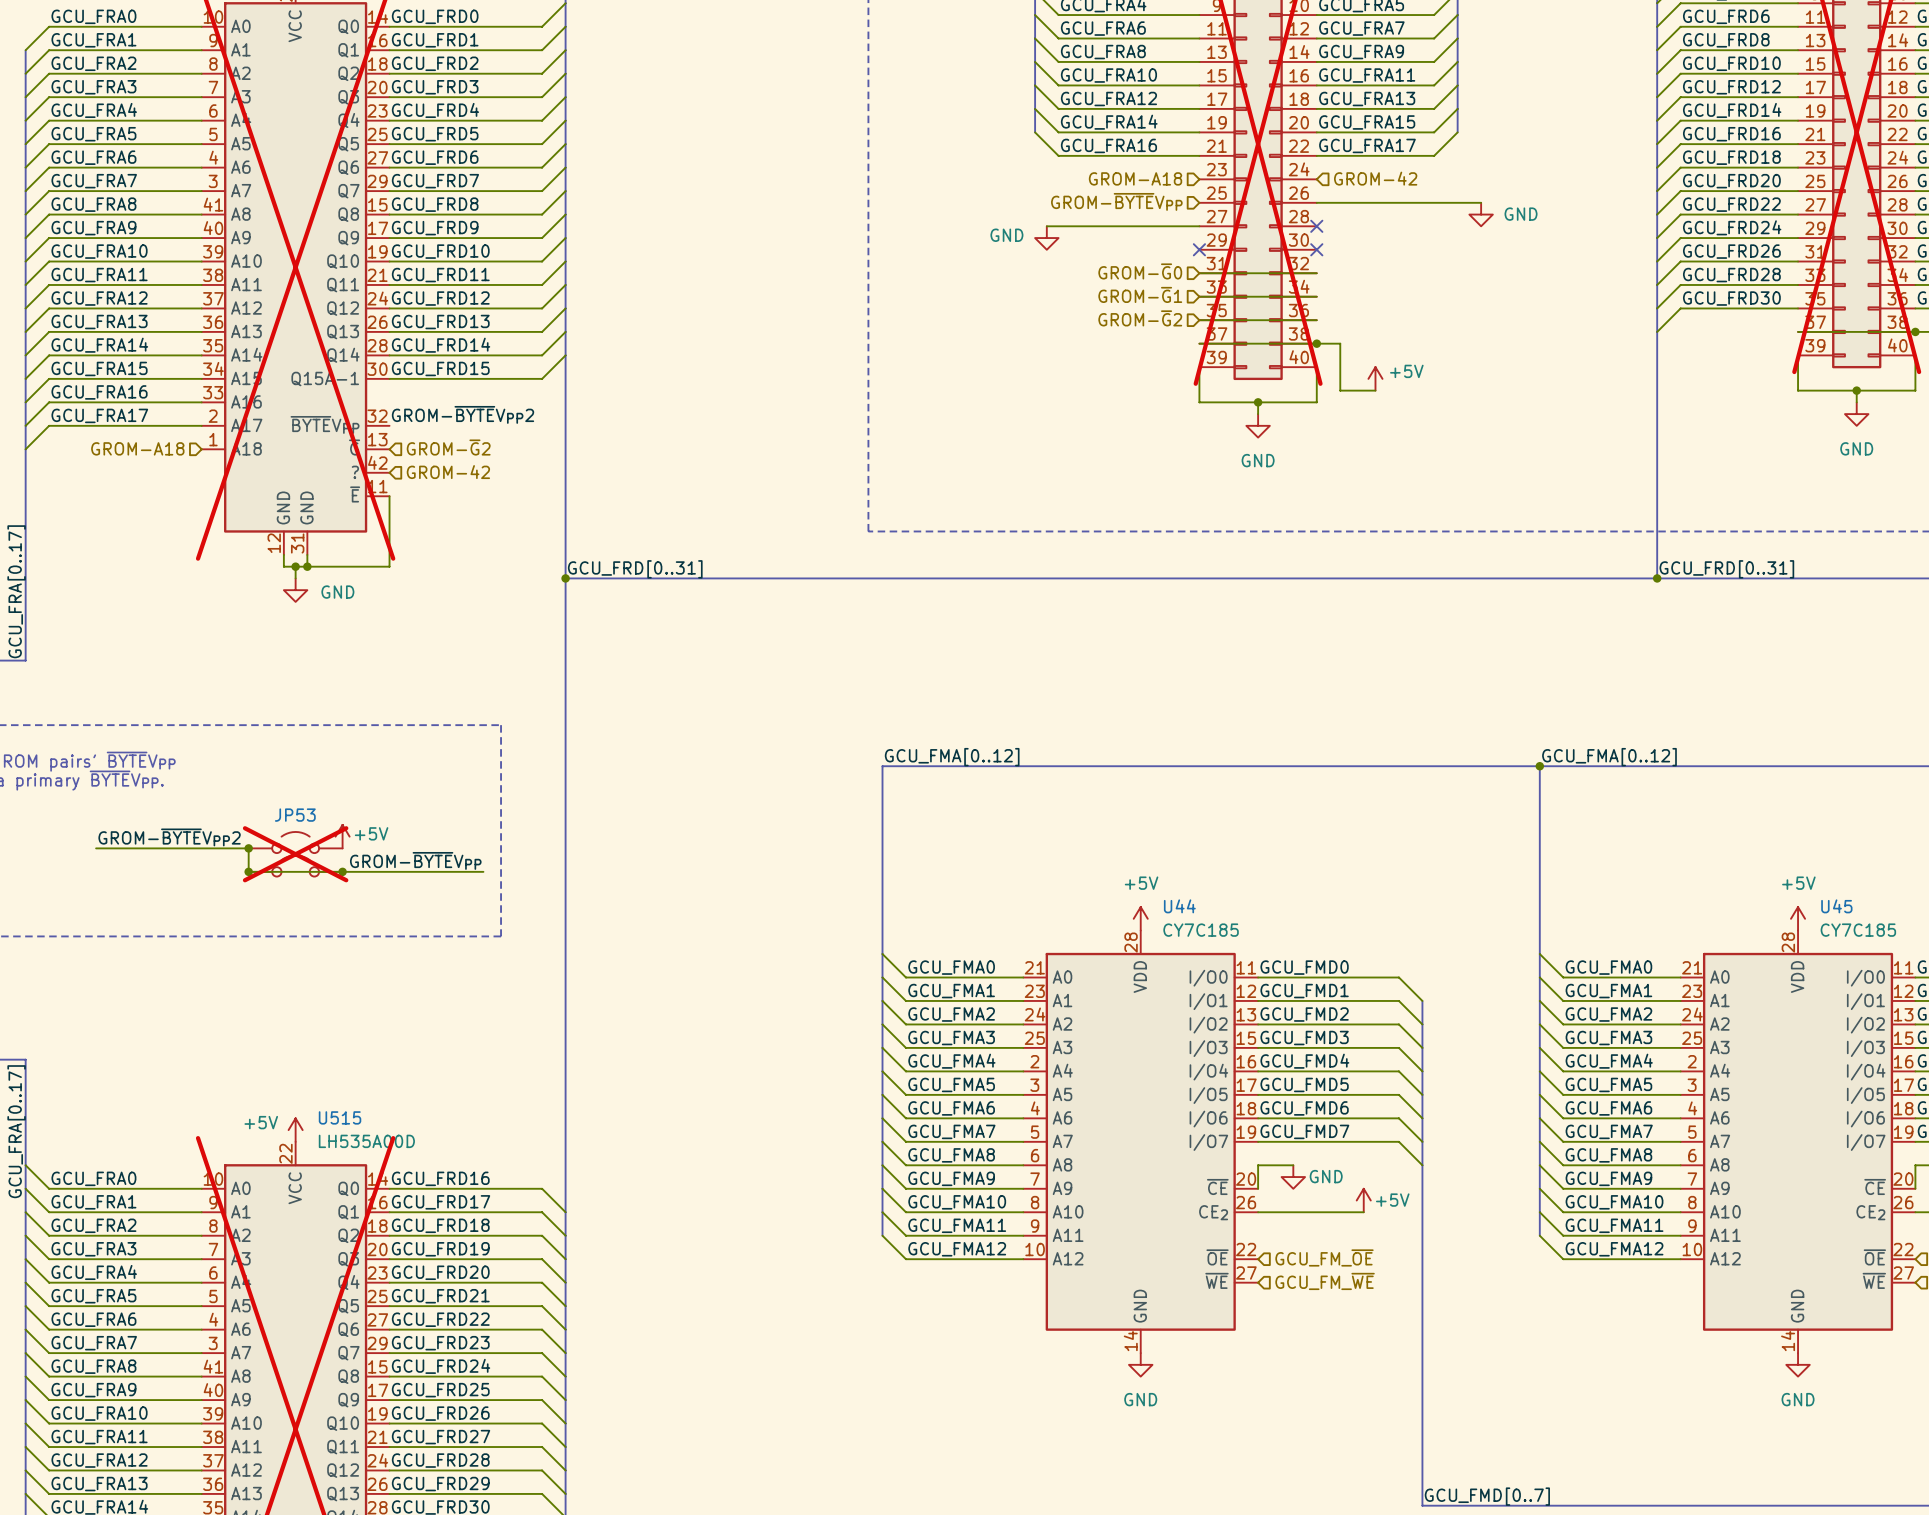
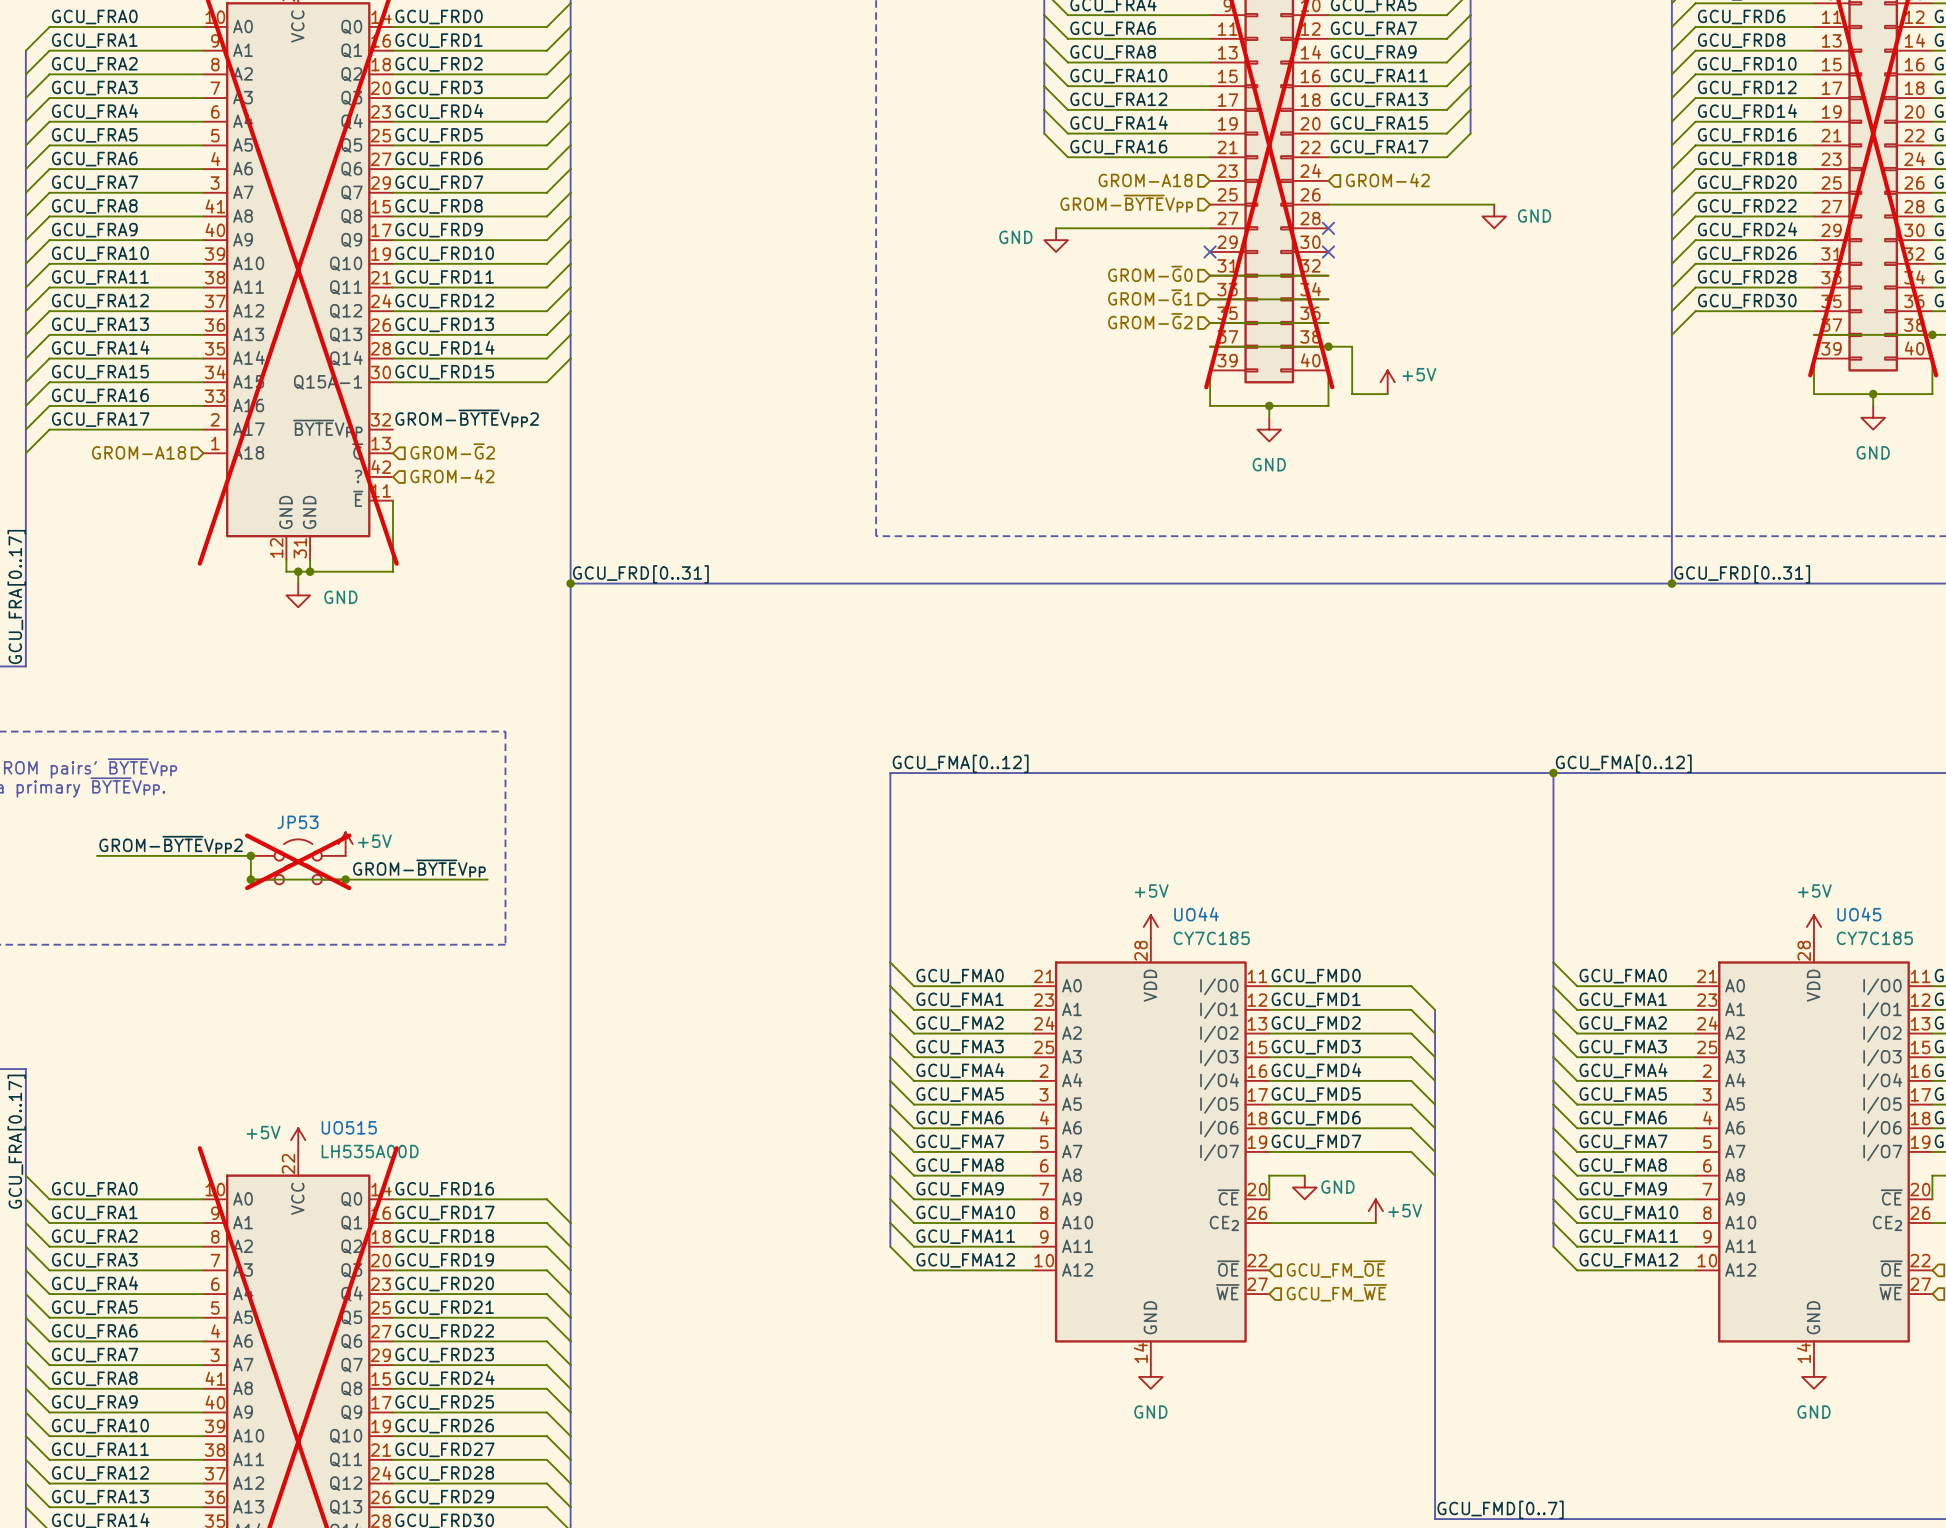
U44 name: U44 (1179, 906) -> UO44 (1196, 914)
U45 name: U45 (1836, 906) -> UO45 (1859, 914)
U515 name: U515 (340, 1117) -> UO515 (349, 1127)

